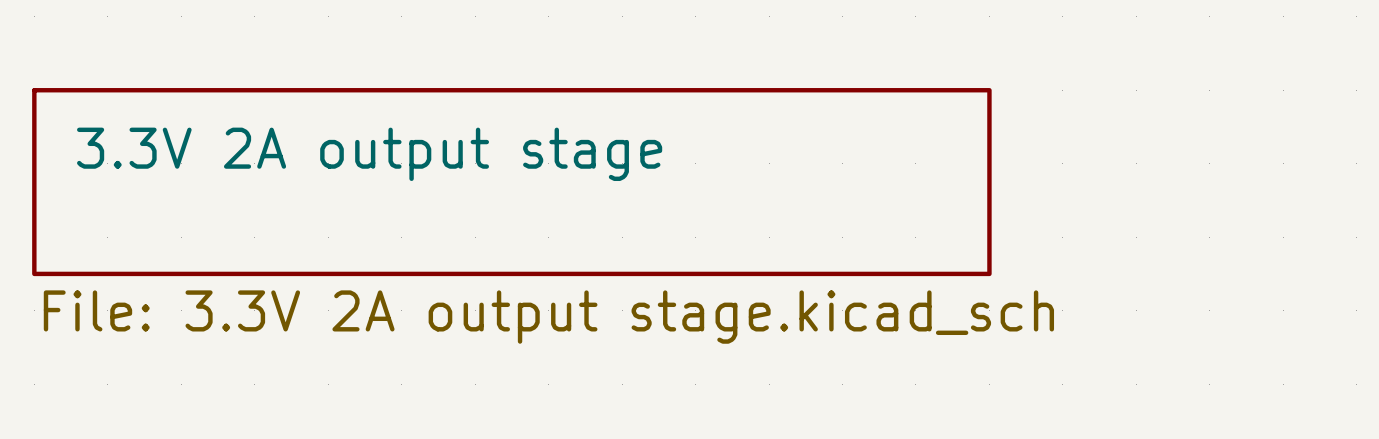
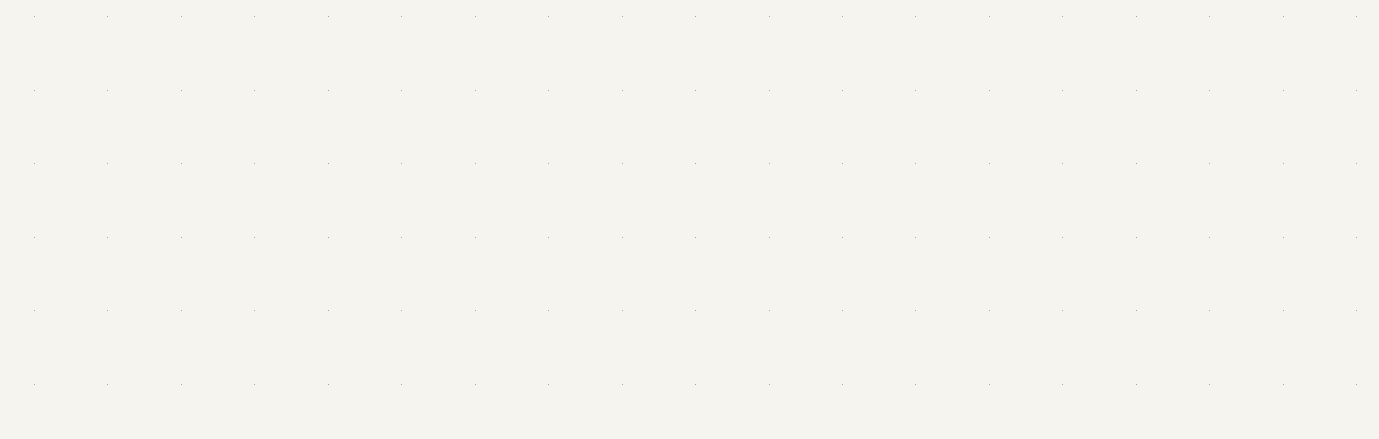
sheet 3.3V 2A output stage: File: 3.3V 2A output stage.kicad_sch (511, 182) -> none

